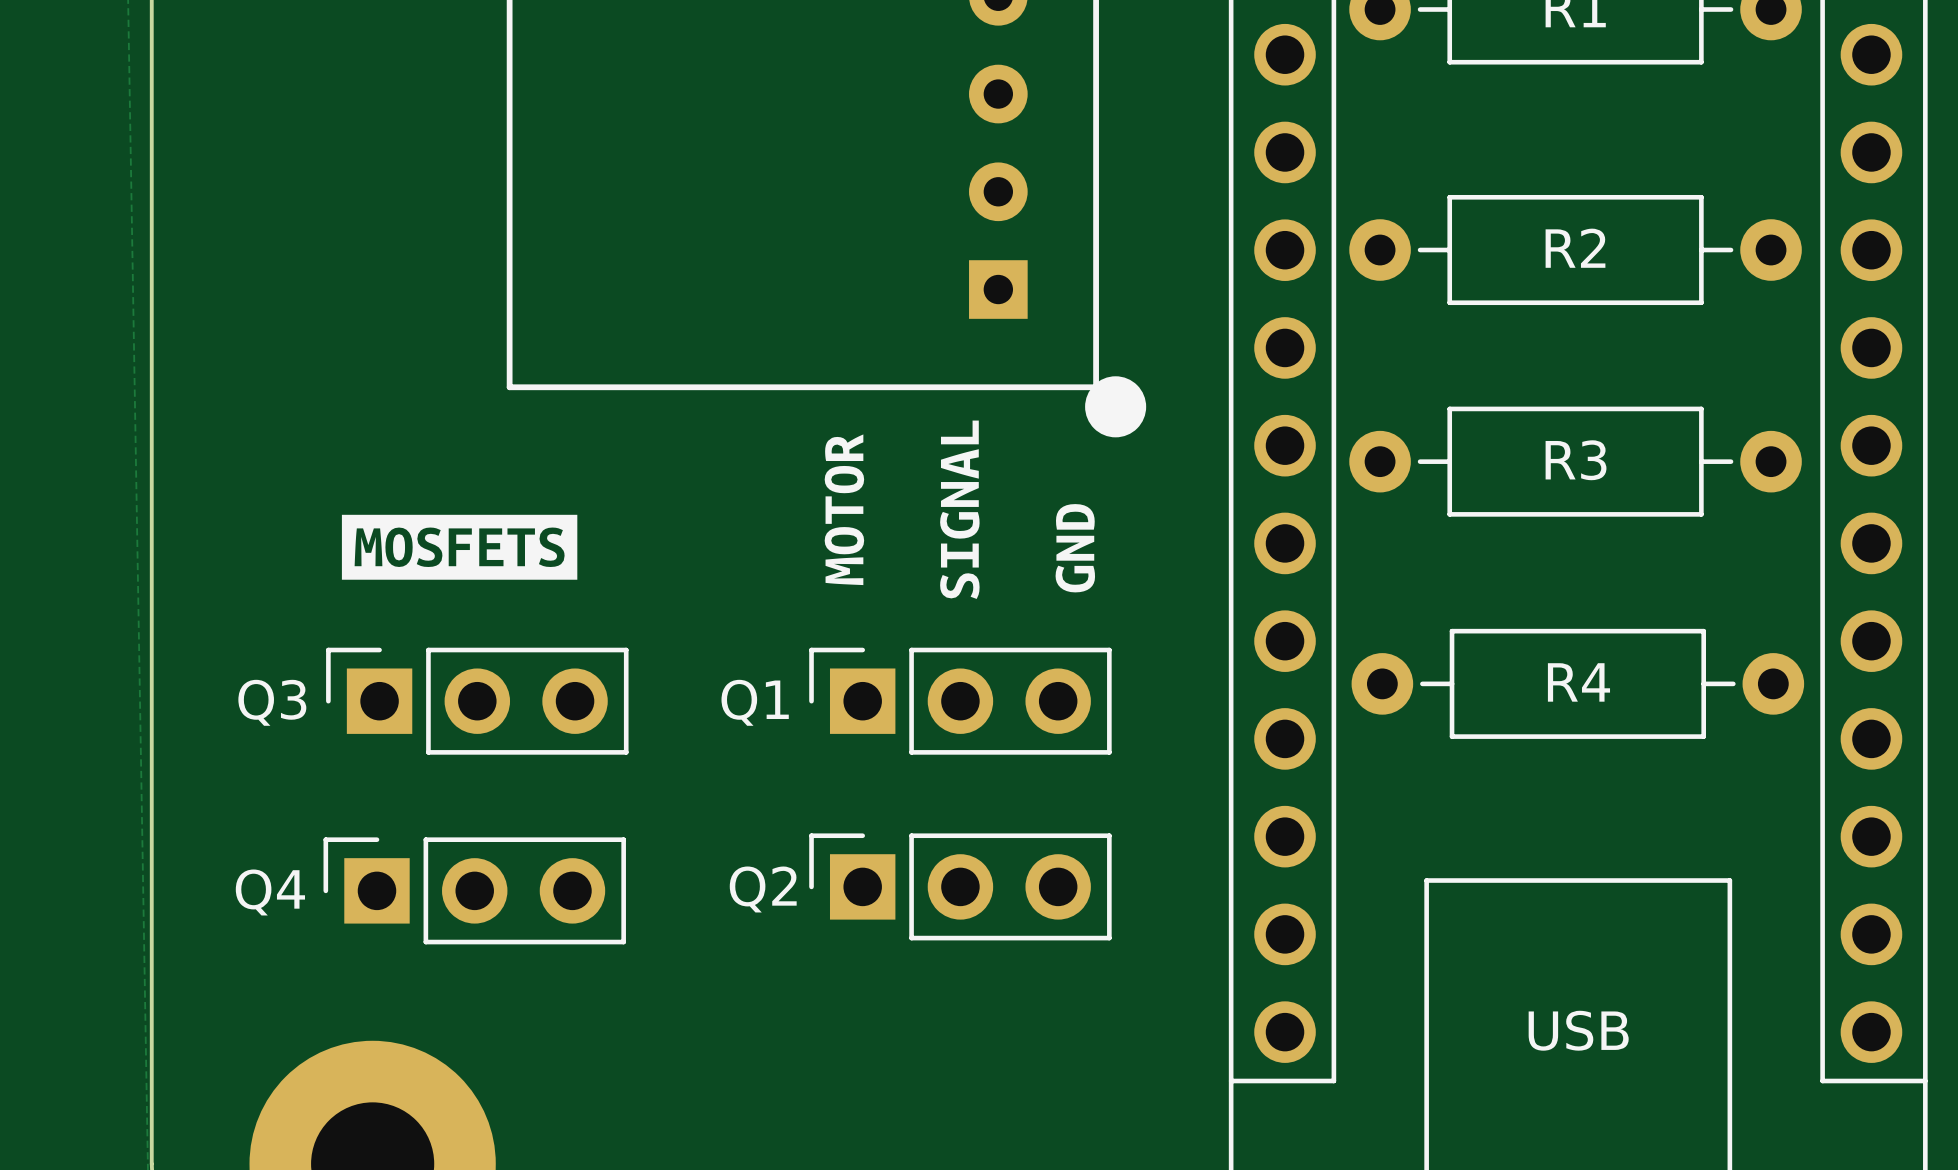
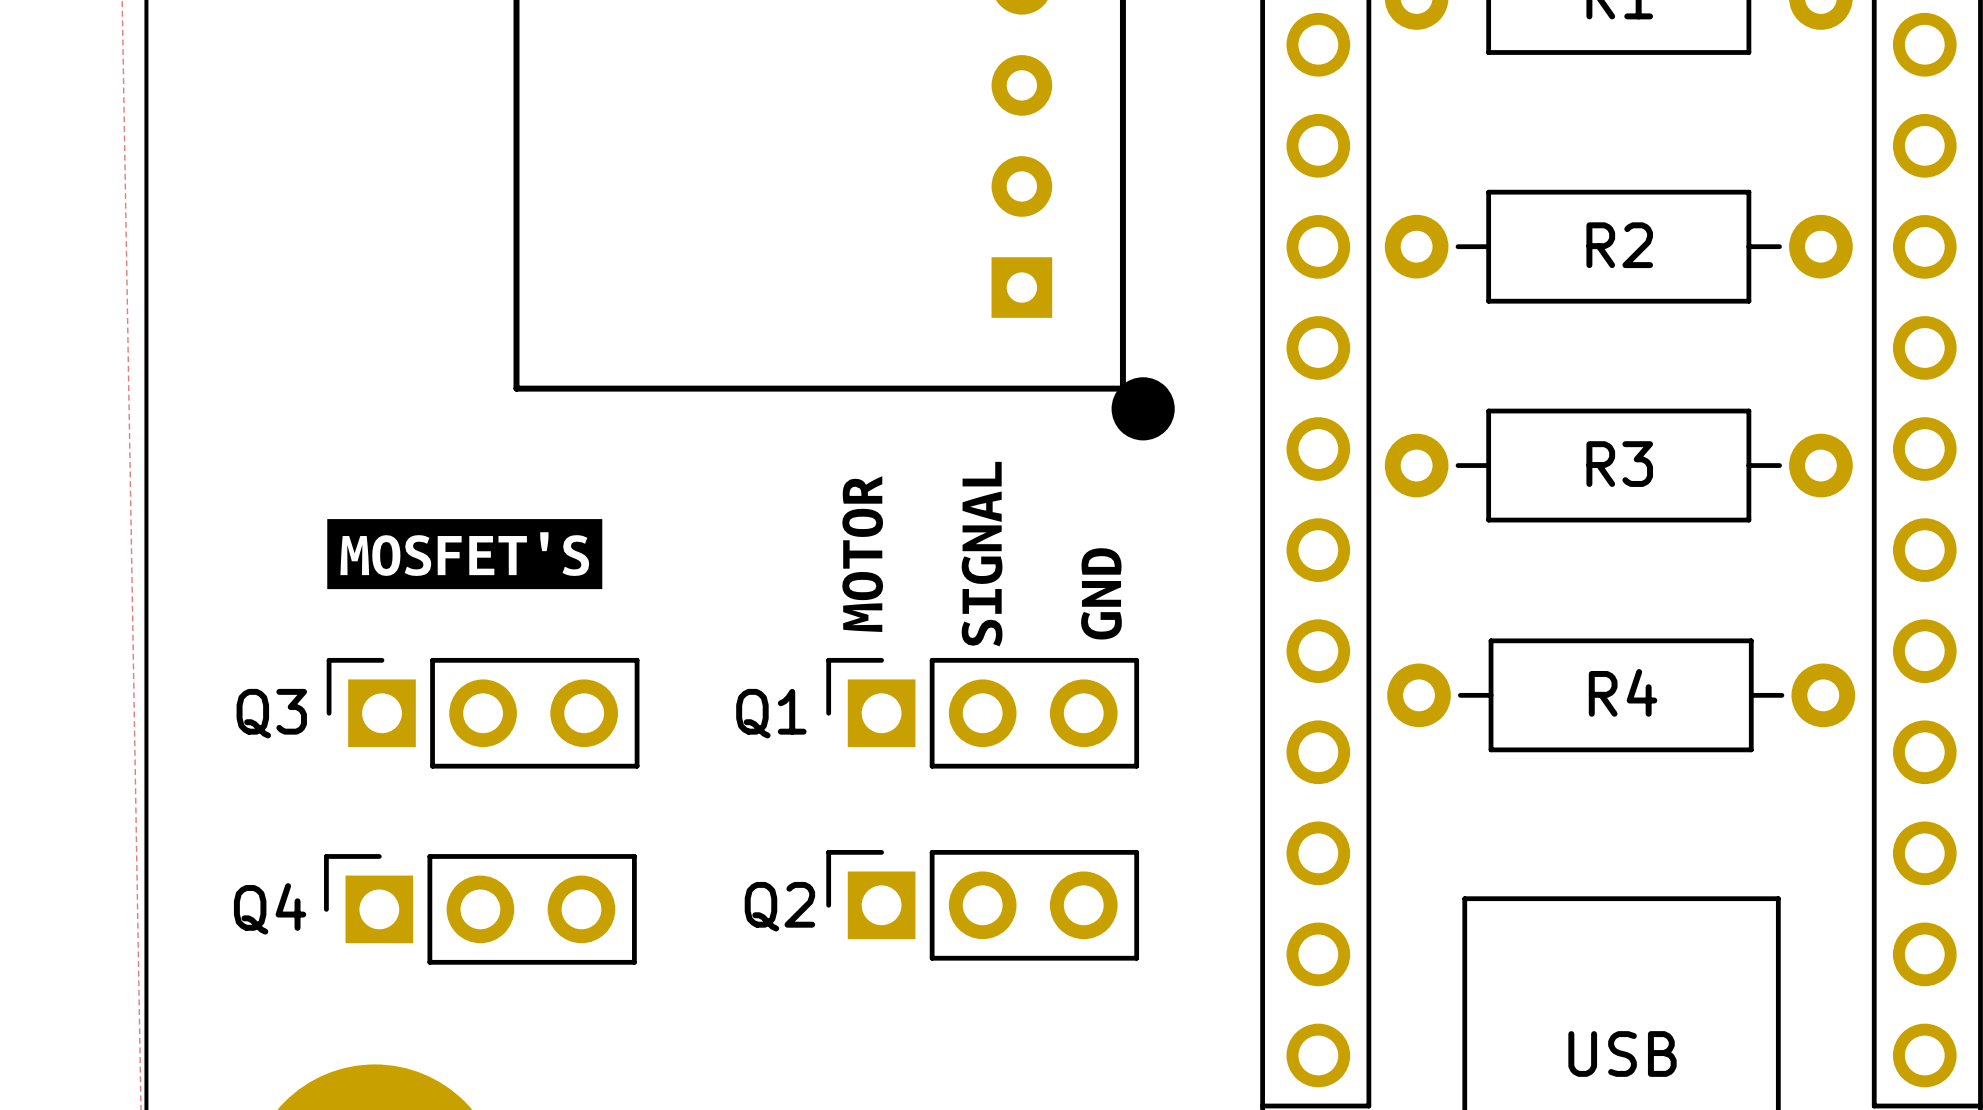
drawing position: (844, 509) -> (862, 554)
drawing position: (959, 509) -> (982, 554)
drawing shape: [341, 514, 578, 580] -> [327, 519, 603, 590]
drawing position: (1075, 548) -> (1101, 593)

